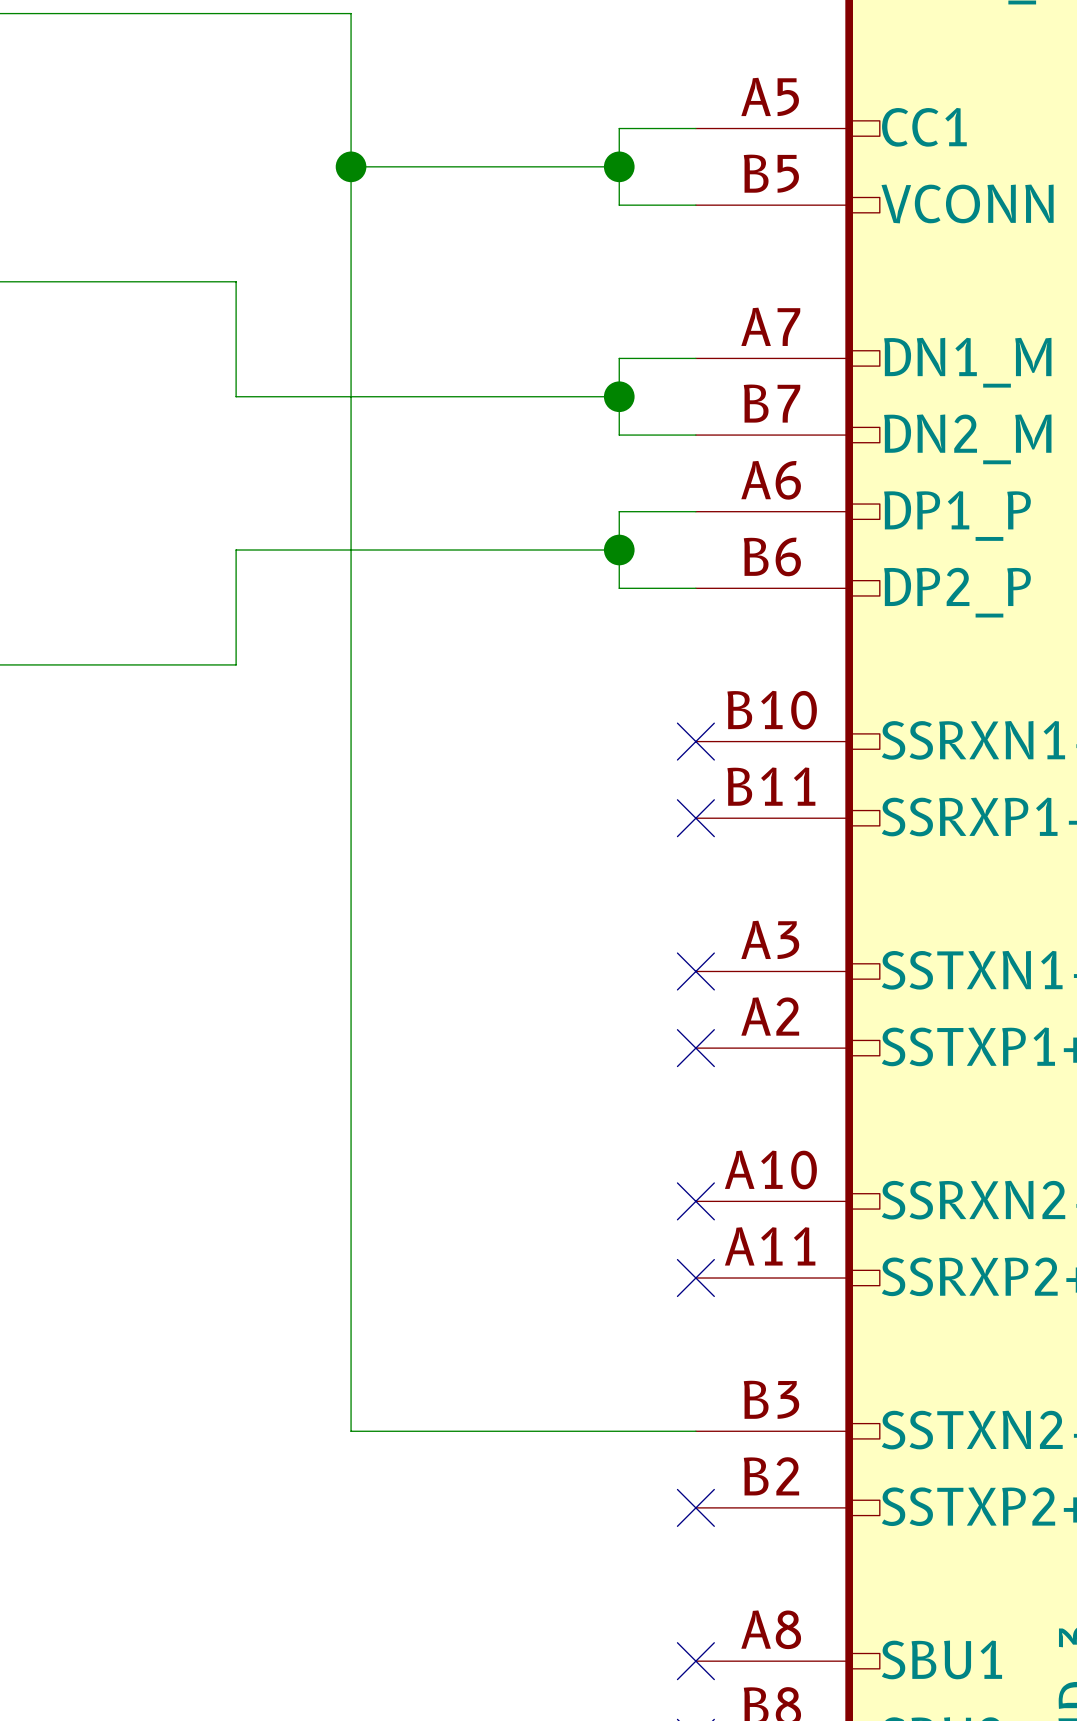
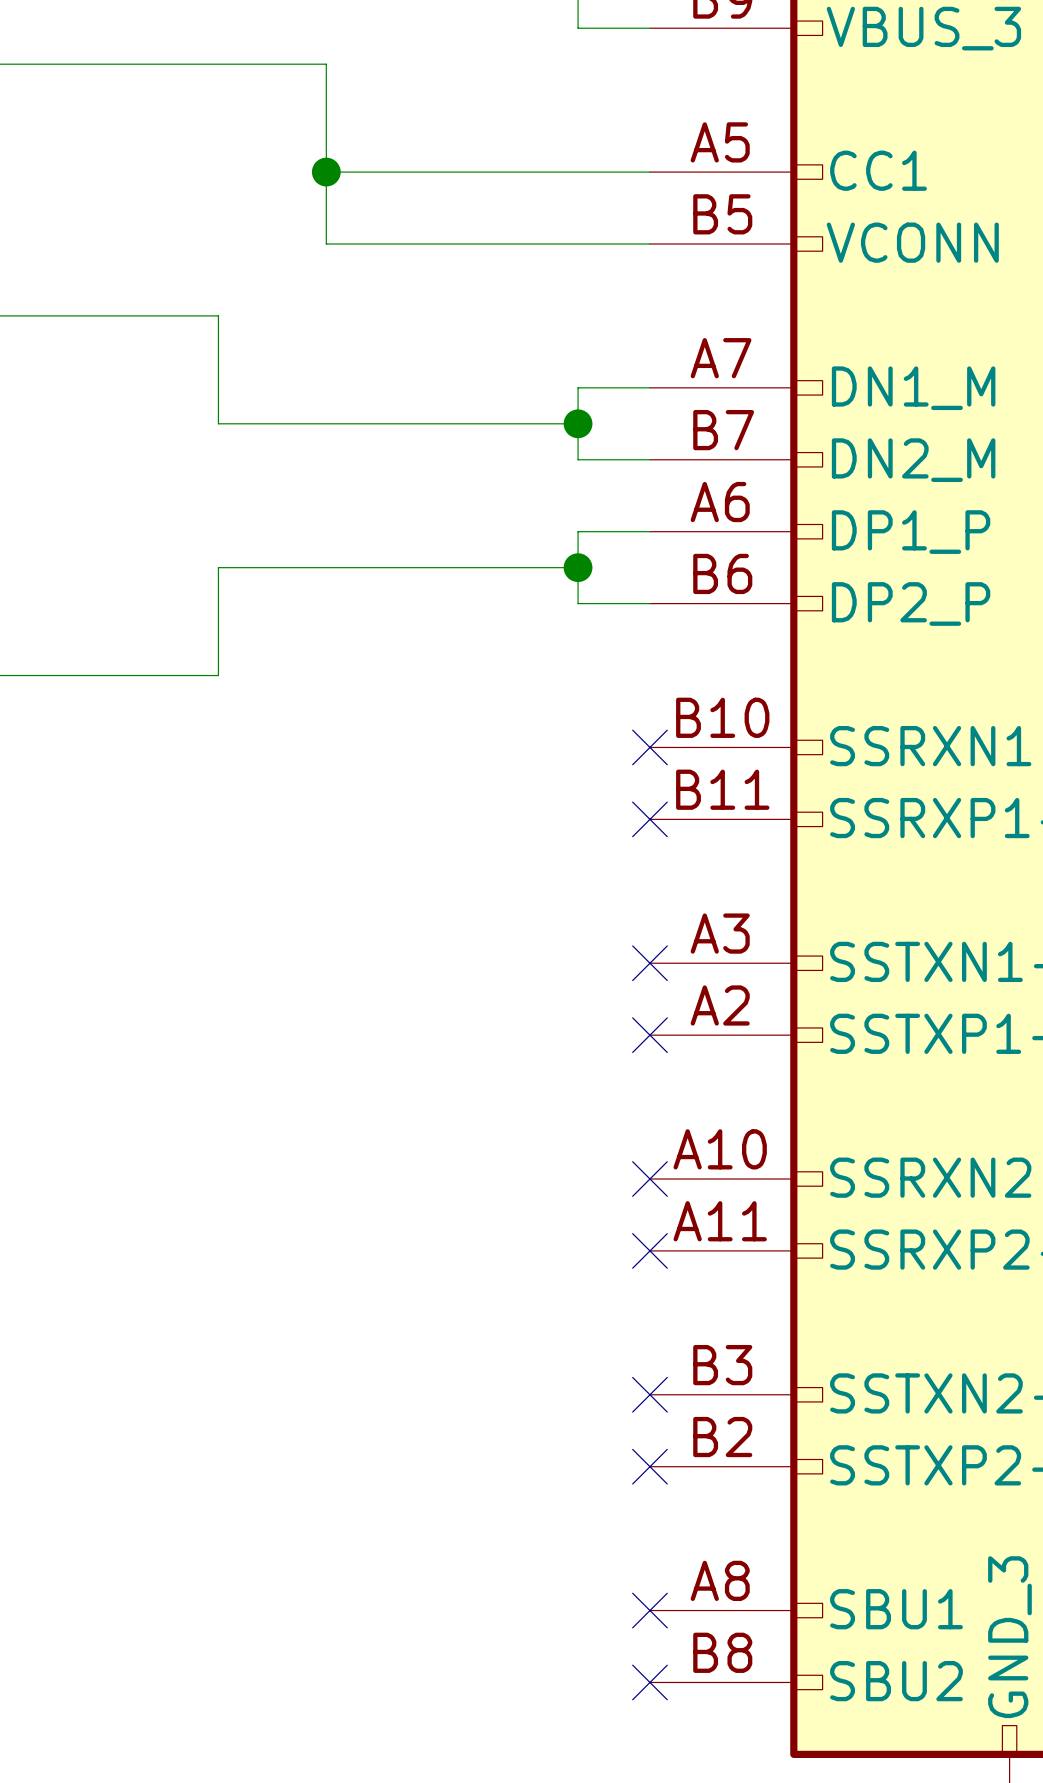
wire: (619, 128) (619, 205) -> (578, 172) (326, 172)
wire: (351, 166) (619, 166) -> none
junction position: (351, 166) -> (326, 172)
junction: (619, 166) -> none
wire: (351, 205) (351, 1431) (695, 1431) -> (326, 244) (578, 244)
no-connect mark: none -> (649, 1394)

